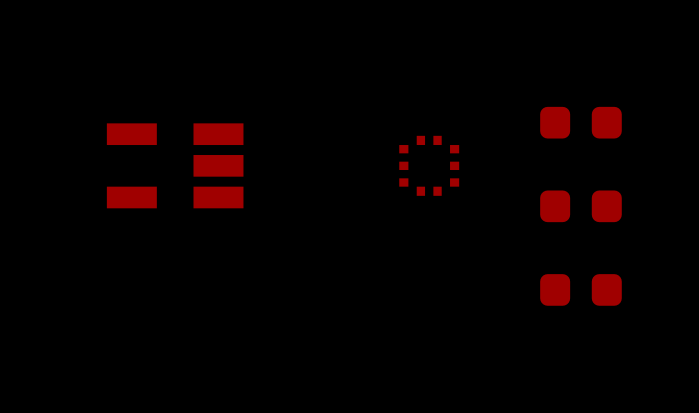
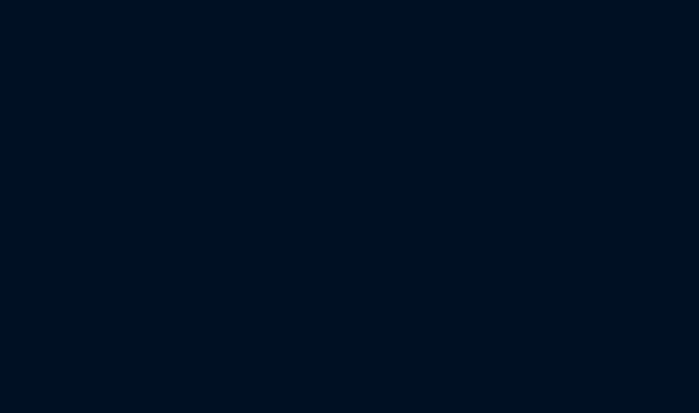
part: (580, 122) -> none
part: (175, 165) -> none
part: (429, 165) -> none
part: (580, 206) -> none
part: (580, 289) -> none

